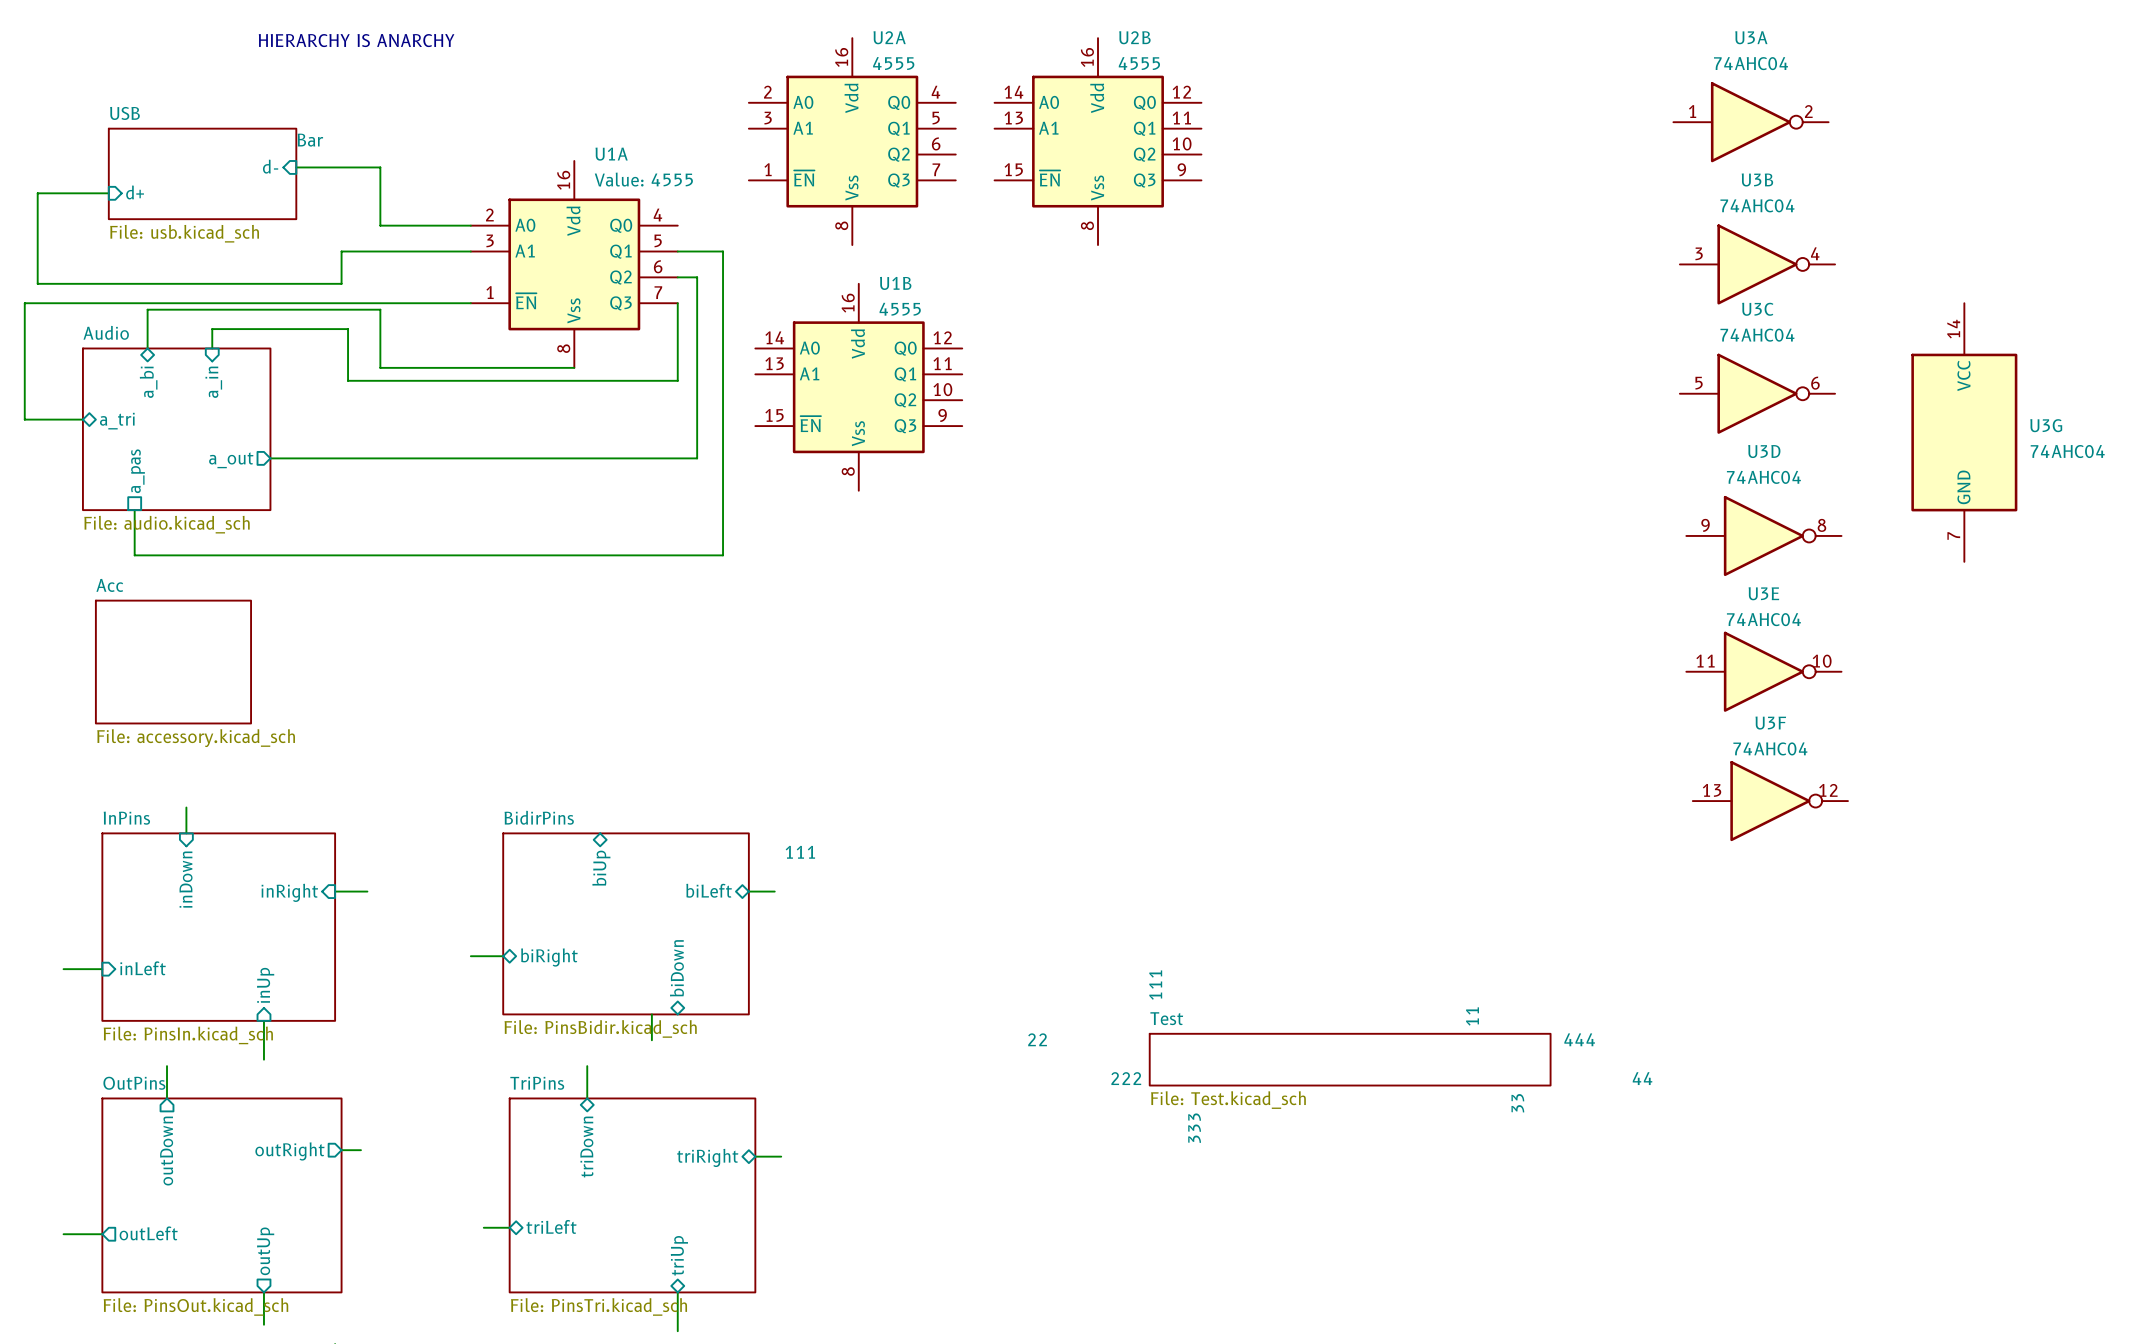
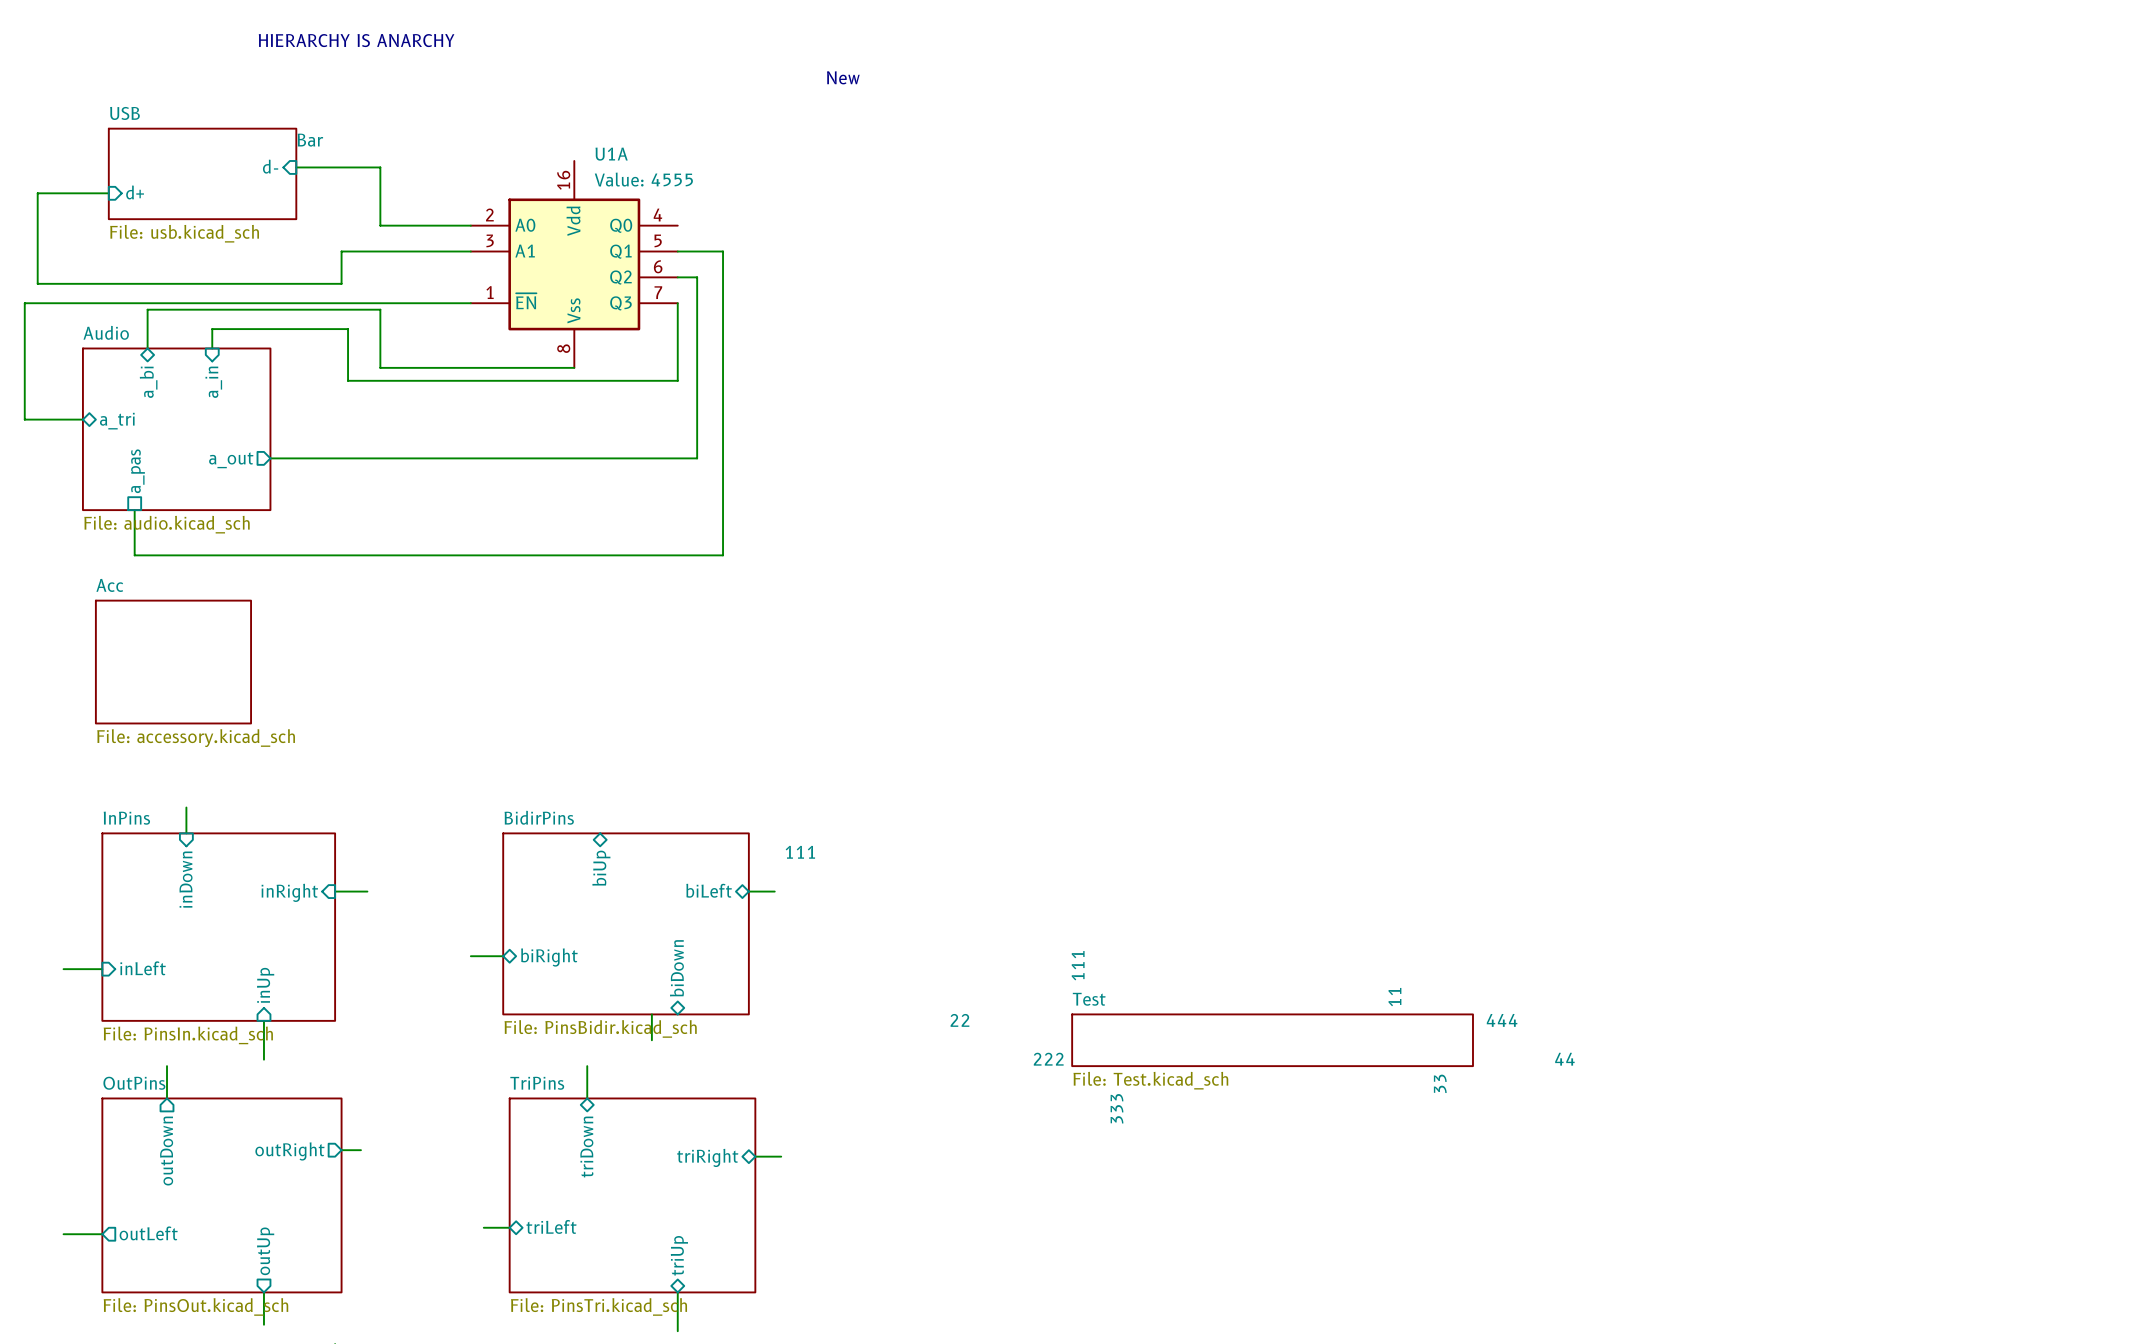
text: none -> New (843, 77)
U3A: 74AHC04 (1751, 122) -> none
U2A: 4555 (852, 141) -> none
U2B: 4555 (1098, 141) -> none
U3B: 74AHC04 (1757, 264) -> none
U1B: 4555 (858, 387) -> none
U3C: 74AHC04 (1757, 393) -> none
U3G: 74AHC04 (1964, 432) -> none
U3D: 74AHC04 (1763, 535) -> none
U3E: 74AHC04 (1763, 671) -> none
U3F: 74AHC04 (1770, 801) -> none
sheet Test position: (1350, 1059) -> (1272, 1040)

